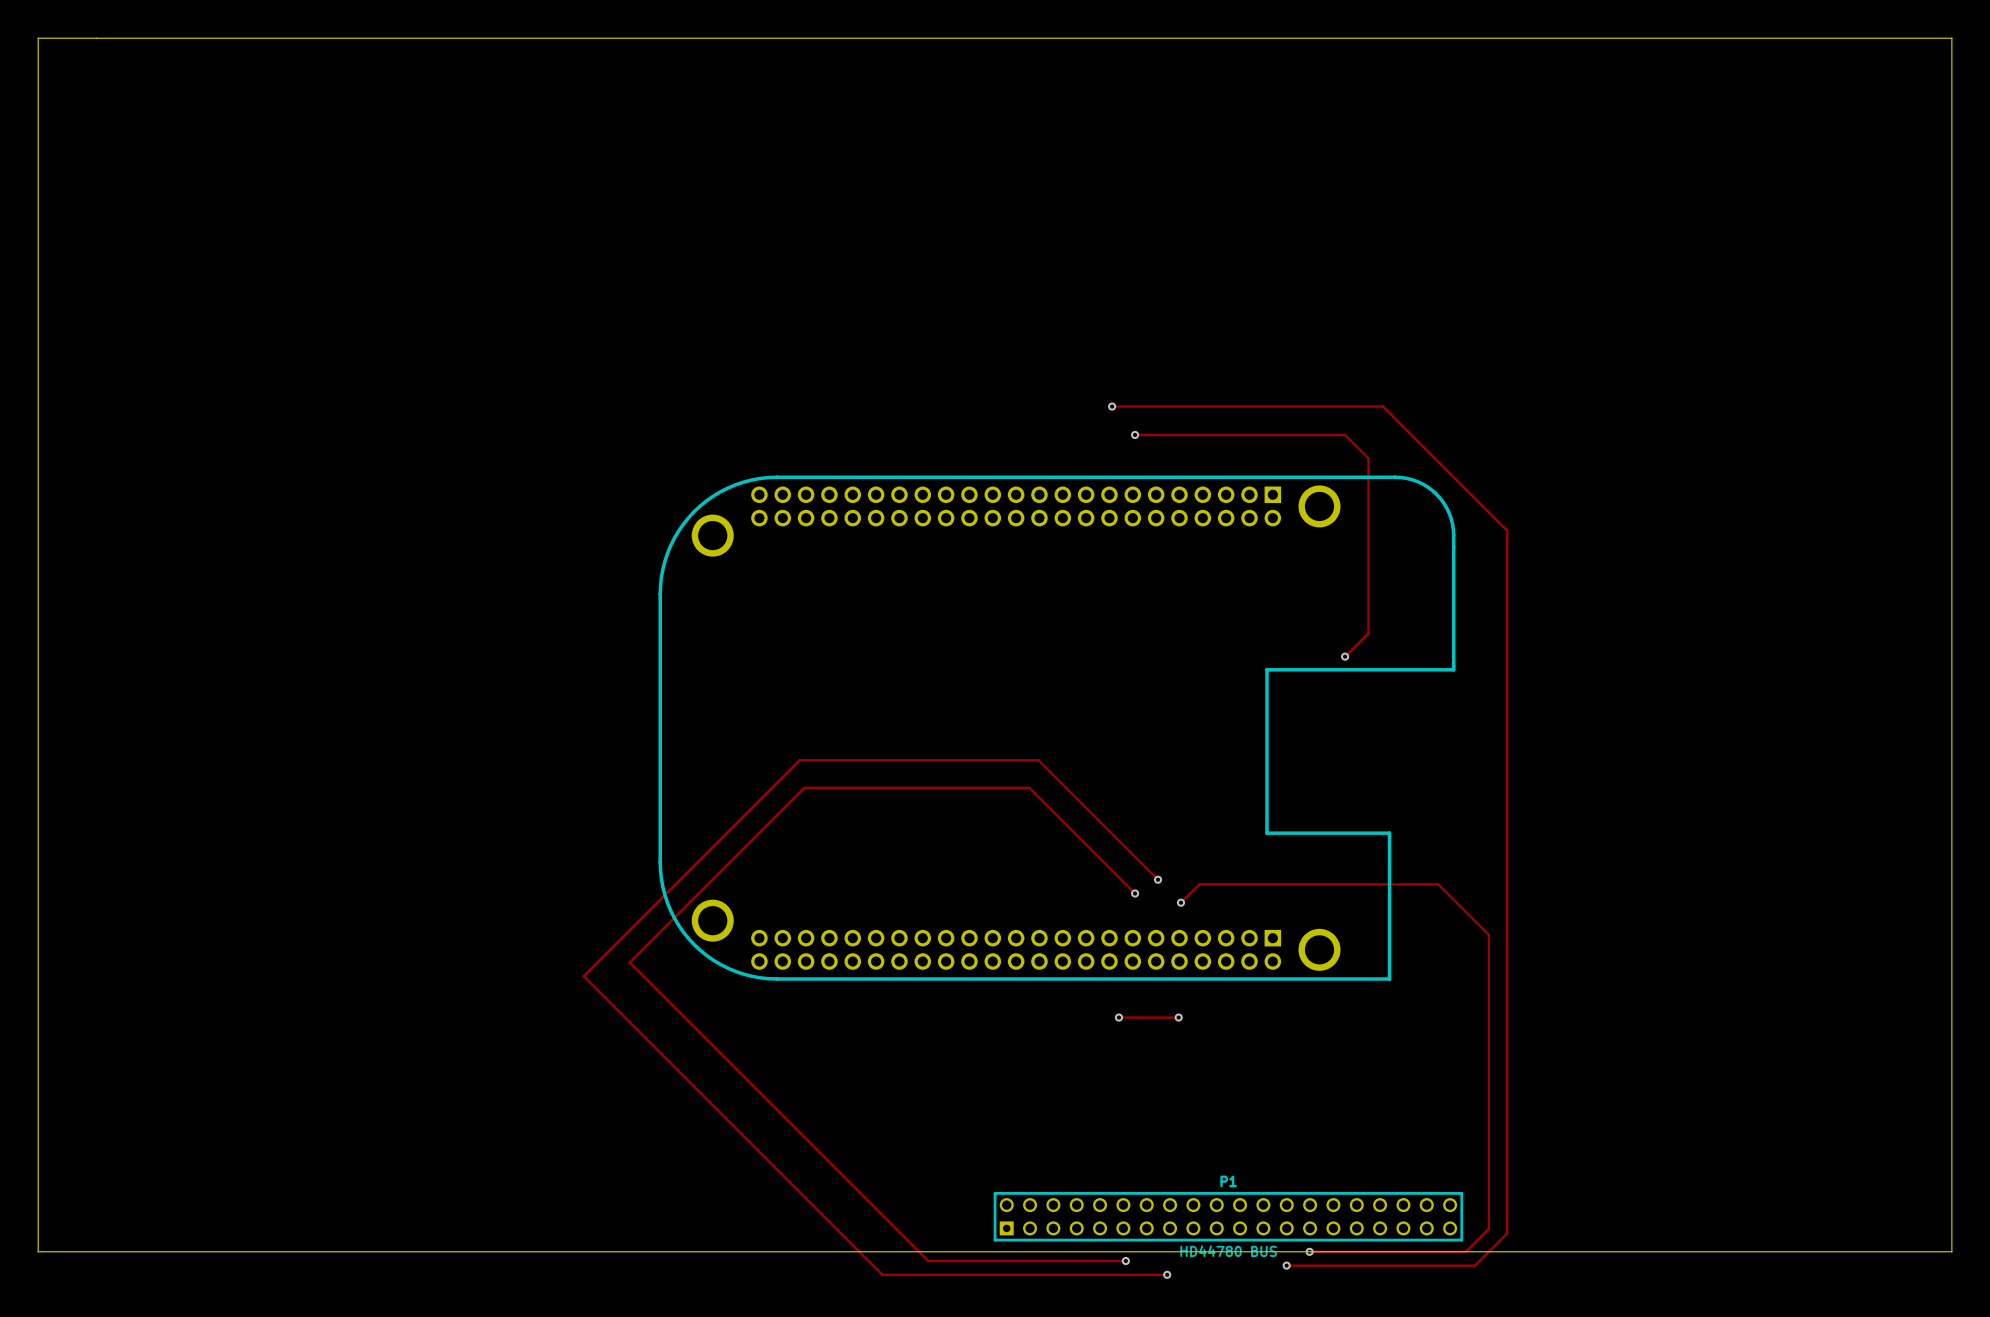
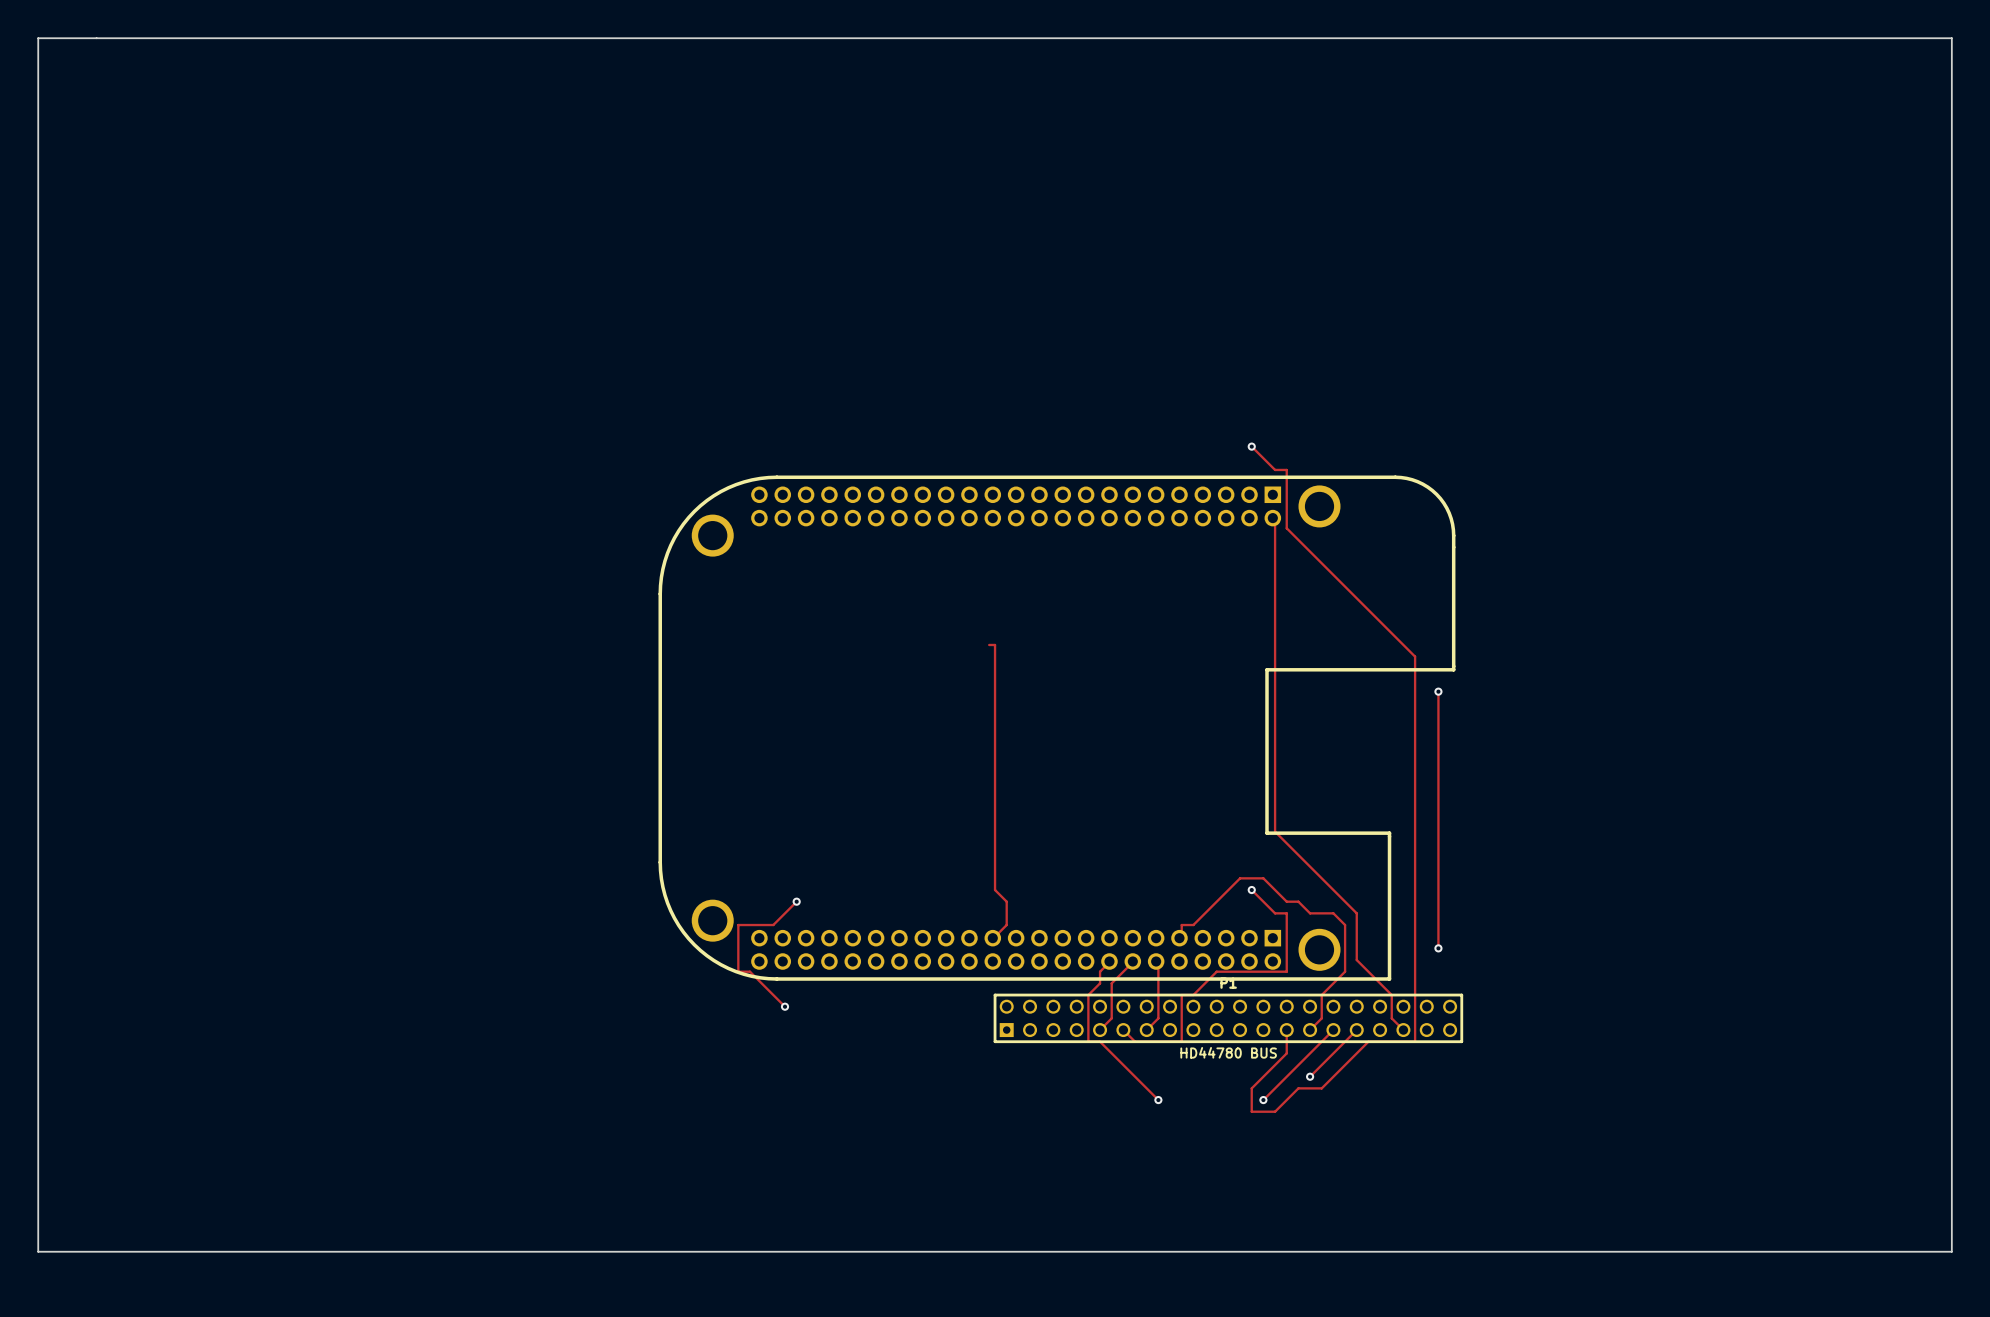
track: (1112, 406) (1383, 406) (1507, 530) (1507, 1233) (1475, 1265) (1286, 1265) -> none
via: (1112, 406) -> none
track: (1135, 434) (1345, 434) (1368, 458) (1368, 633) (1345, 656) -> none
via: (1135, 434) -> none
track: none -> (1251, 446) (1275, 469) (1286, 469) (1286, 528) (1415, 656) (1415, 1041) (1368, 1041) (1321, 1088) (1298, 1088) (1275, 1111) (1251, 1111) (1251, 1088) (1286, 1053) (1286, 1030)
via: none -> (1251, 446)
track: none -> (1269, 516) (1275, 516) (1275, 831) (1356, 913) (1356, 960) (1391, 995) (1391, 1018) (1403, 1030)
track: none -> (989, 644) (995, 644) (995, 890) (1006, 901) (1006, 925) (995, 936)
via: (1345, 656) -> none
track: none -> (1438, 691) (1438, 948)
via: none -> (1438, 691)
track: (1158, 879) (1038, 760) (799, 760) (583, 976) (882, 1274) (1167, 1274) -> none
via: (1158, 879) -> none
track: none -> (1251, 890) (1275, 913) (1286, 913) (1286, 971) (1216, 971) (1193, 995) (1181, 995) (1181, 1041) (1135, 1041) (1123, 1030)
via: none -> (1251, 890)
track: (1135, 893) (1029, 787) (804, 787) (629, 962) (928, 1261) (1125, 1261) -> none
via: (1135, 893) -> none
track: none -> (796, 901) (773, 925) (738, 925) (738, 971) (750, 971) (785, 1006)
via: none -> (796, 901)
track: (1181, 902) (1199, 884) (1438, 884) (1488, 934) (1488, 1228) (1465, 1251) (1309, 1251) -> none
via: (1181, 902) -> none
track: none -> (1175, 936) (1181, 936) (1181, 925) (1193, 925) (1240, 878) (1263, 878) (1286, 901) (1298, 901) (1310, 913) (1333, 913) (1345, 925) (1345, 971) (1321, 995) (1321, 1018) (1310, 1030)
via: none -> (1438, 948)
track: none -> (1105, 960) (1111, 960) (1100, 971) (1100, 983) (1088, 995) (1088, 1041) (1100, 1041) (1158, 1100)
track: none -> (1129, 960) (1135, 960) (1111, 983) (1111, 1018) (1100, 1030)
track: none -> (1152, 960) (1158, 960) (1158, 1018) (1146, 1030)
via: none -> (785, 1006)
track: (1118, 1017) (1178, 1017) -> none
via: (1118, 1017) -> none
via: (1178, 1017) -> none
track: none -> (1333, 1030) (1263, 1100)
track: none -> (1356, 1030) (1310, 1076)
via: none -> (1310, 1076)
via: none -> (1158, 1100)
via: none -> (1263, 1100)
P1 position: (1228, 1216) -> (1228, 1018)
via: (1309, 1251) -> none
via: (1125, 1261) -> none
via: (1286, 1265) -> none
via: (1167, 1274) -> none

